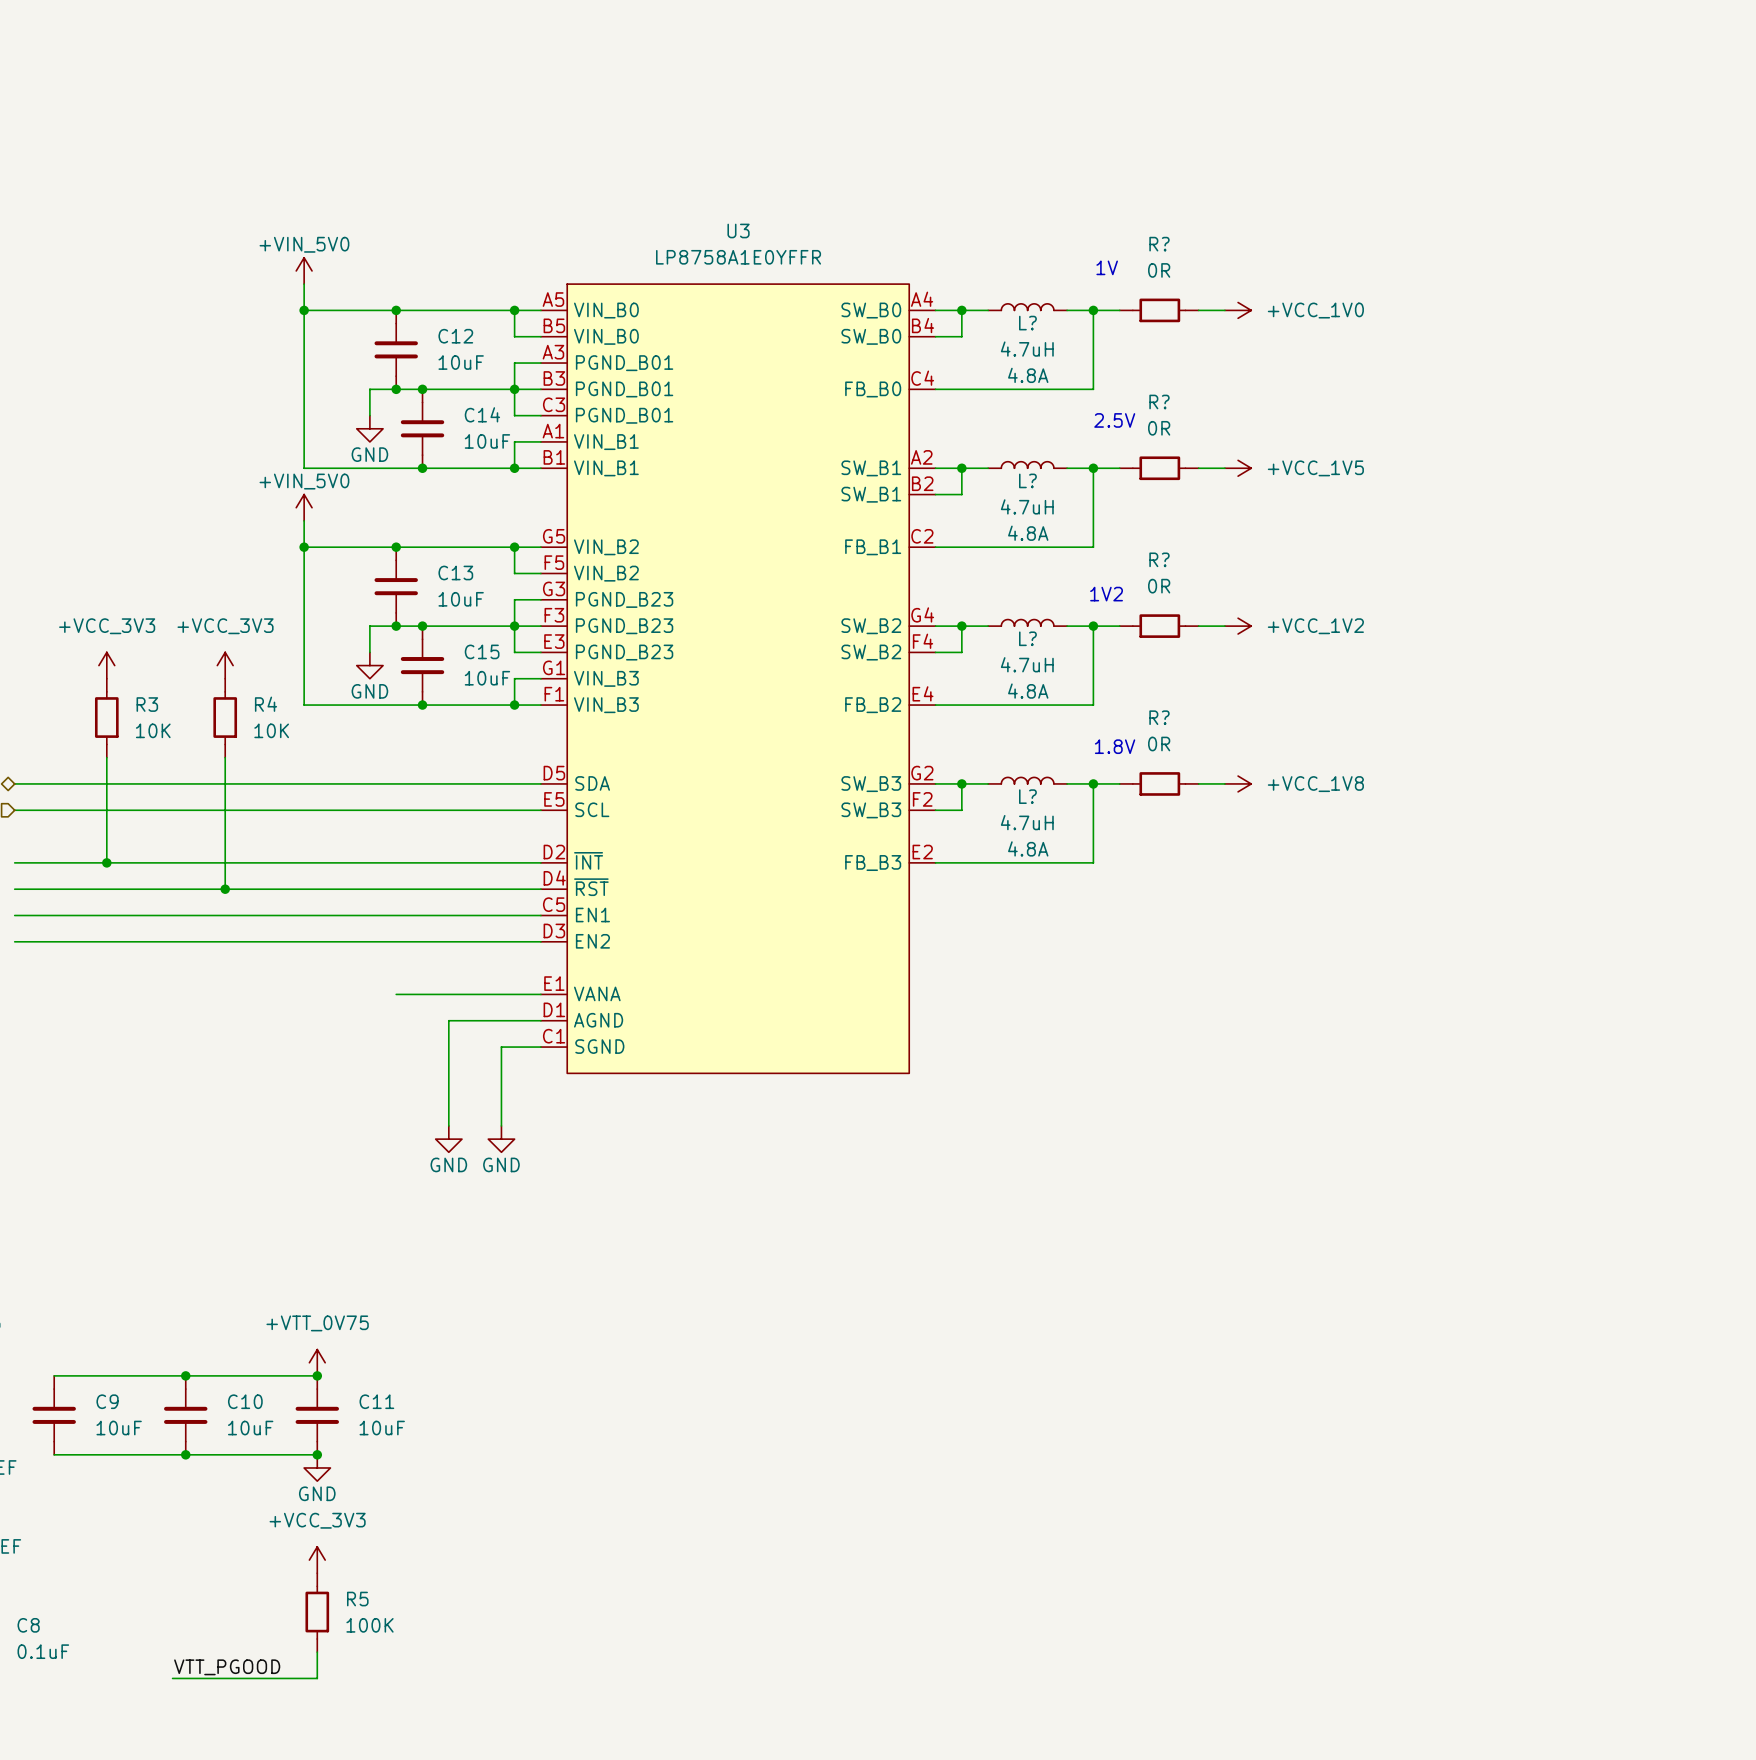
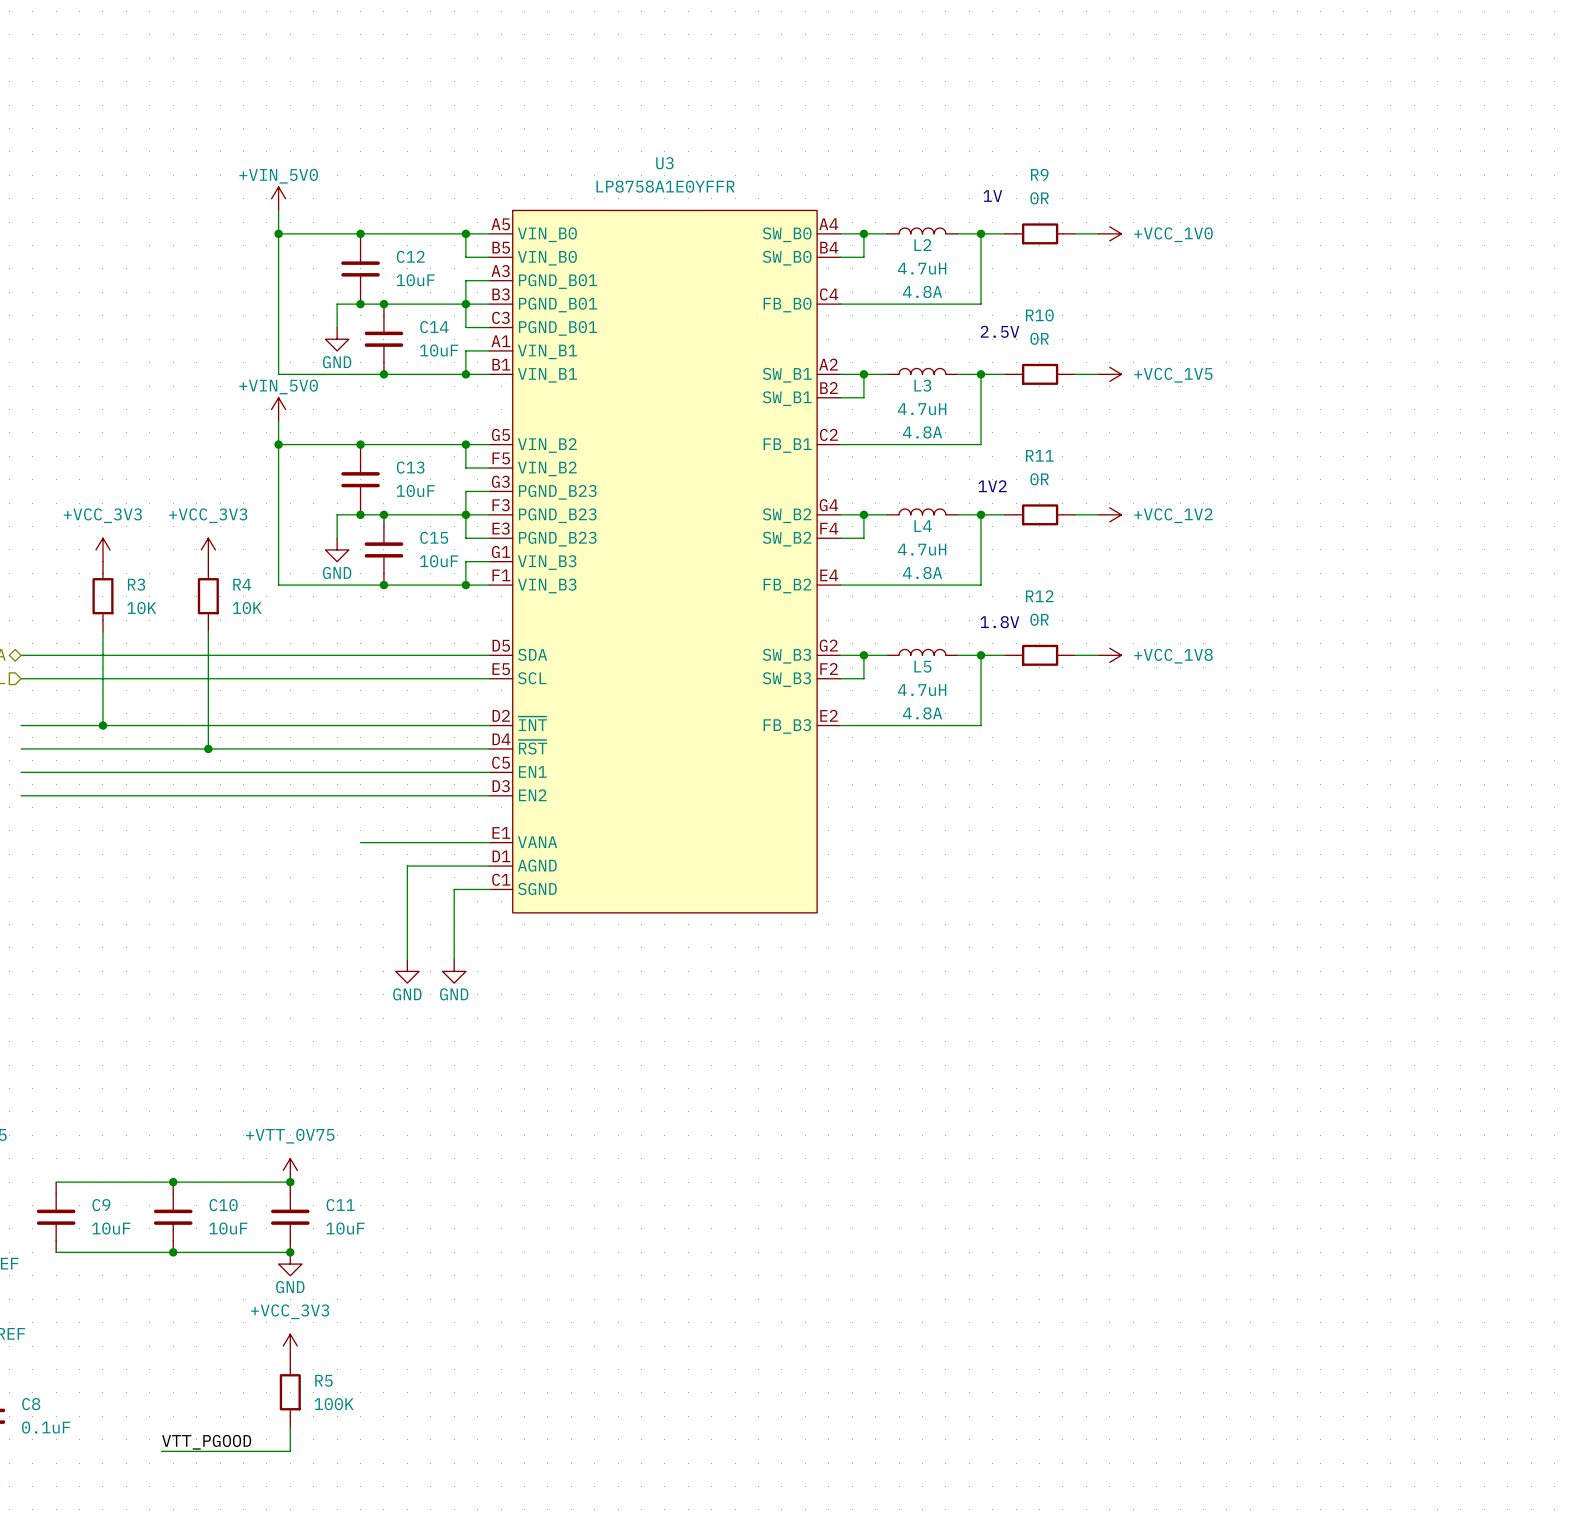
R? name: R? (1159, 244) -> R9 (1039, 174)
L? name: L? (1027, 323) -> L2 (922, 245)
R? name: R? (1159, 401) -> R10 (1039, 315)
L? name: L? (1027, 480) -> L3 (922, 385)
R? name: R? (1159, 559) -> R11 (1039, 455)
L? name: L? (1027, 638) -> L4 (923, 526)
R? name: R? (1159, 717) -> R12 (1039, 596)
L? name: L? (1027, 796) -> L5 (922, 666)

